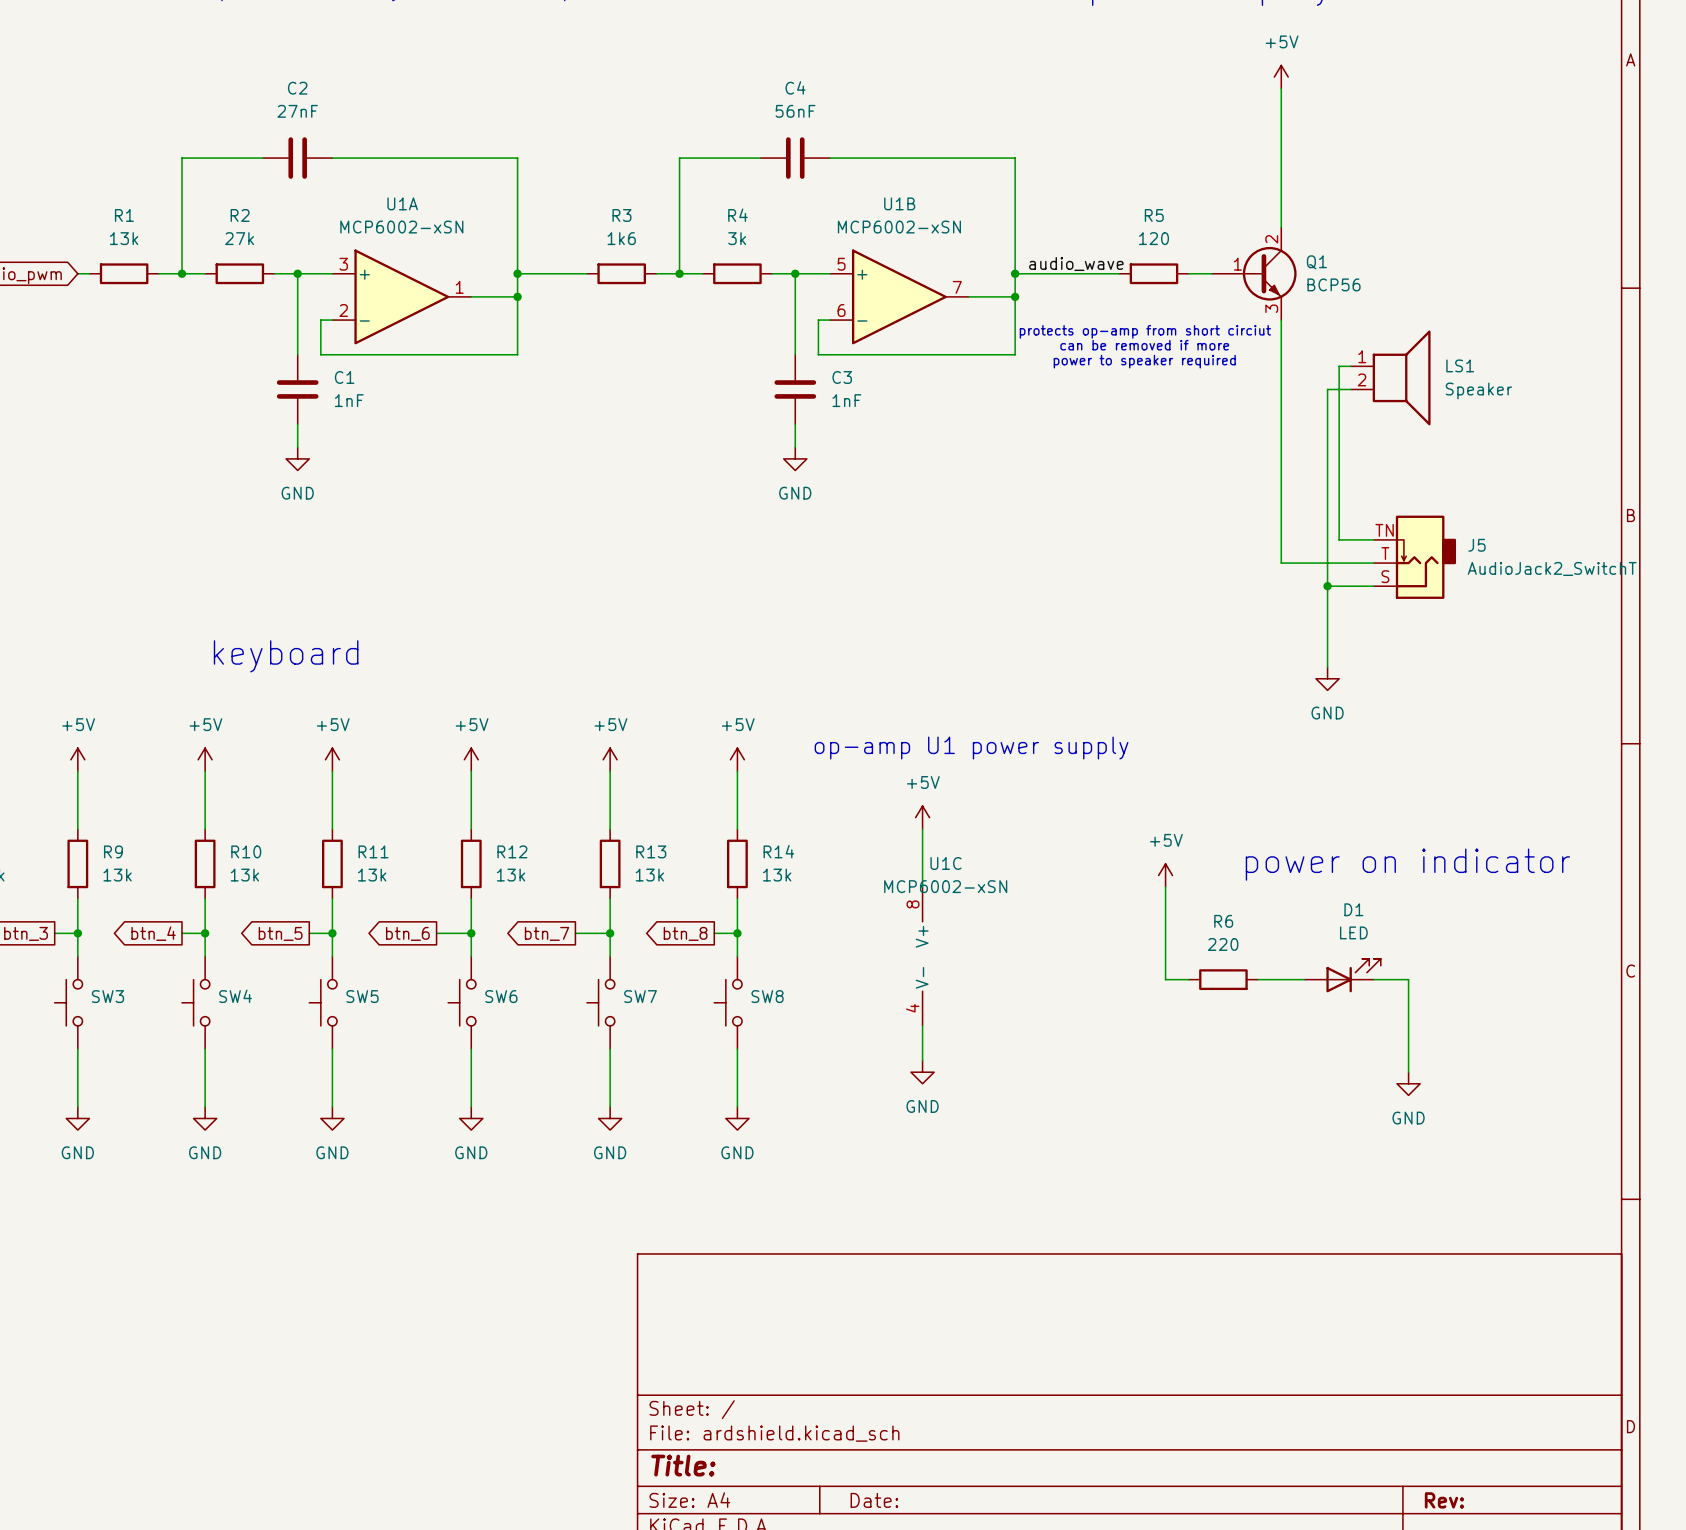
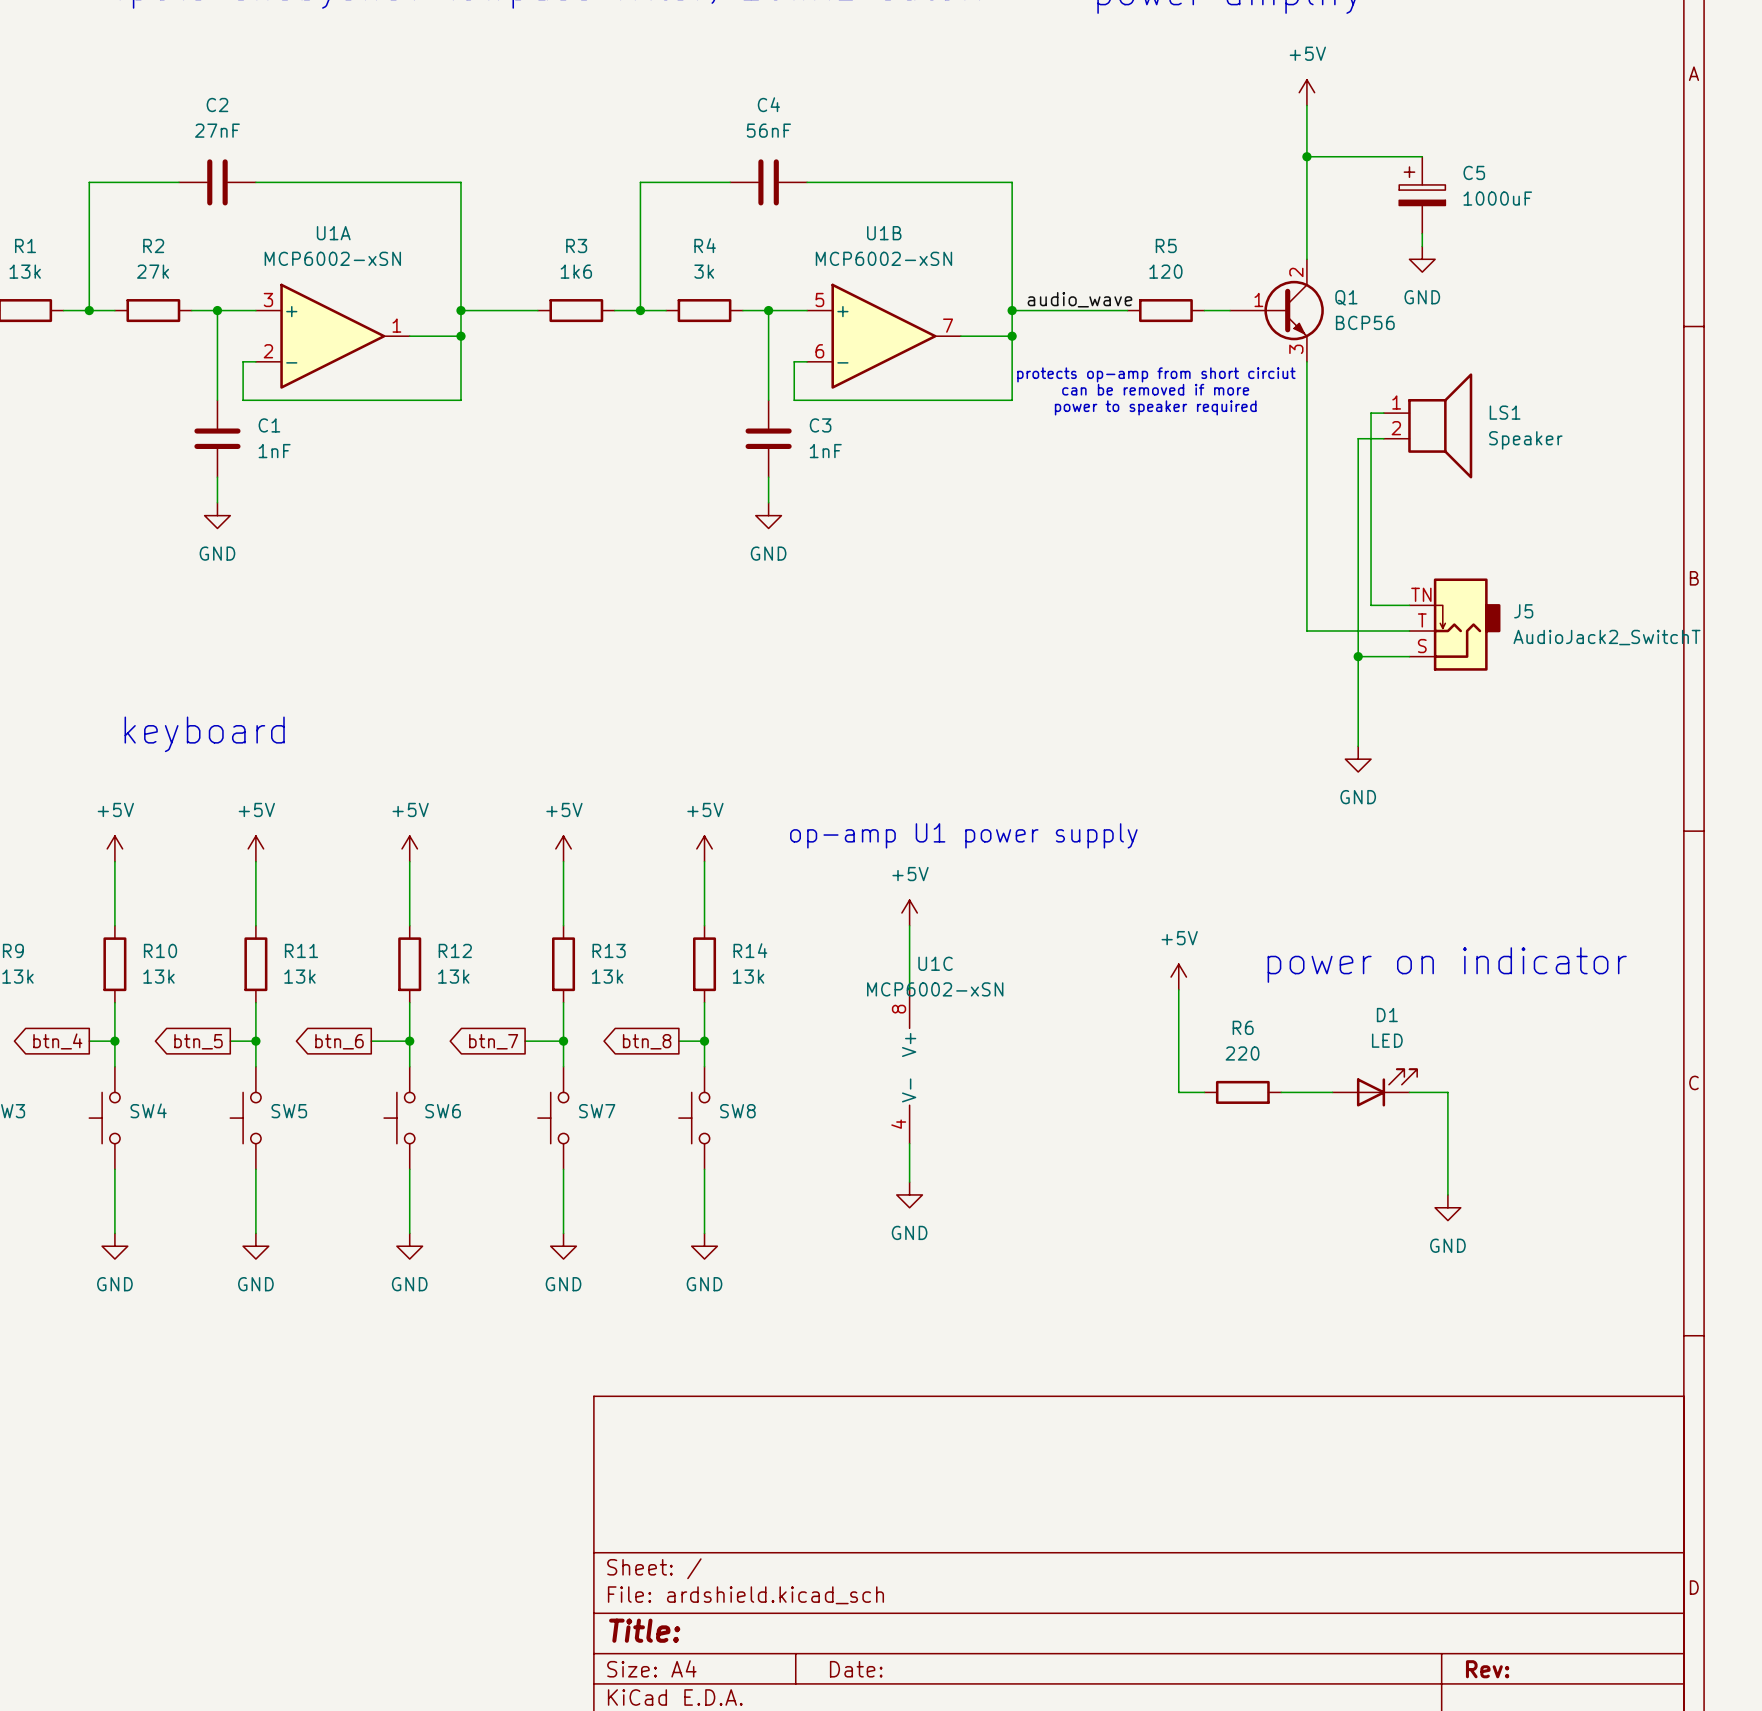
wire: none -> (1306, 156) (1422, 156)
junction: none -> (1306, 156)
C5: none -> 1000uF (1422, 195)
wire: none -> (1422, 233) (1422, 246)
power symbol: none -> GND (1422, 259)

